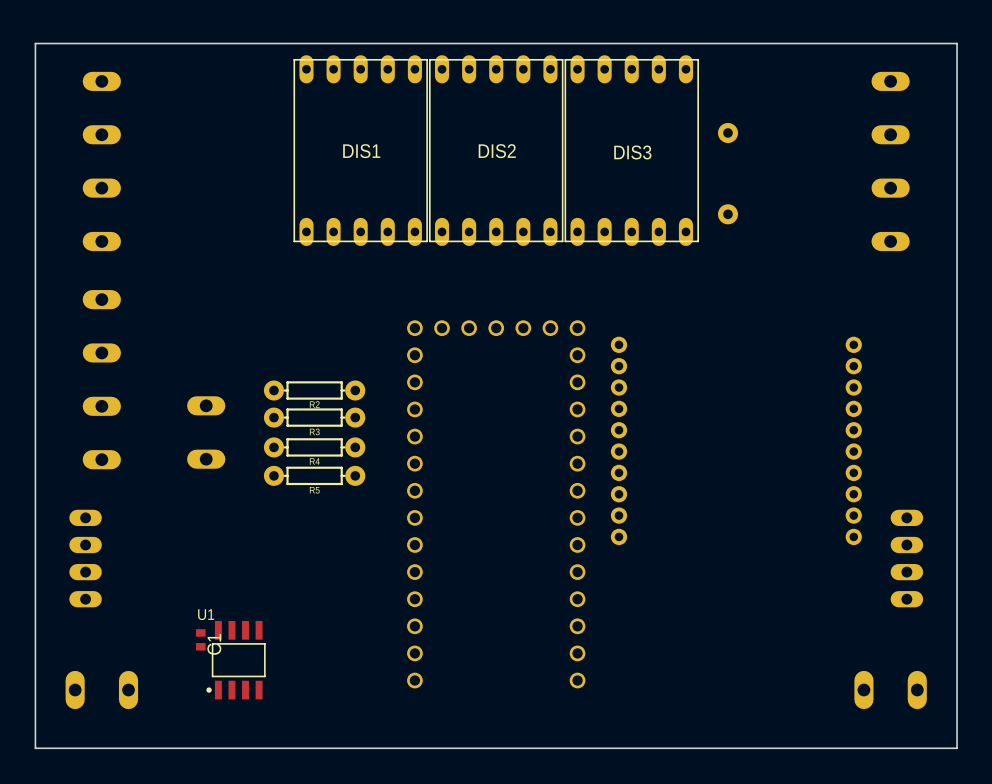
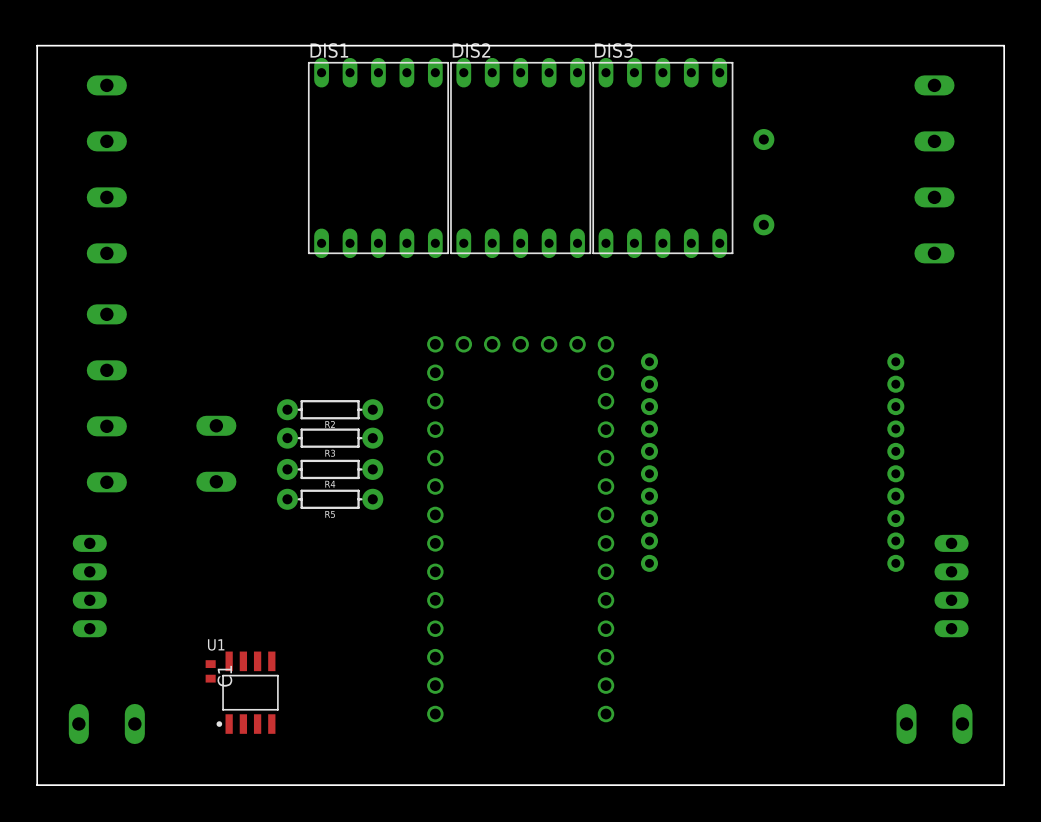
DIS1 name position: DIS1 (361, 151) -> DIS1 (329, 50)
DIS2 name position: DIS2 (497, 151) -> DIS2 (471, 50)
DIS3 name position: DIS3 (632, 152) -> DIS3 (613, 50)

